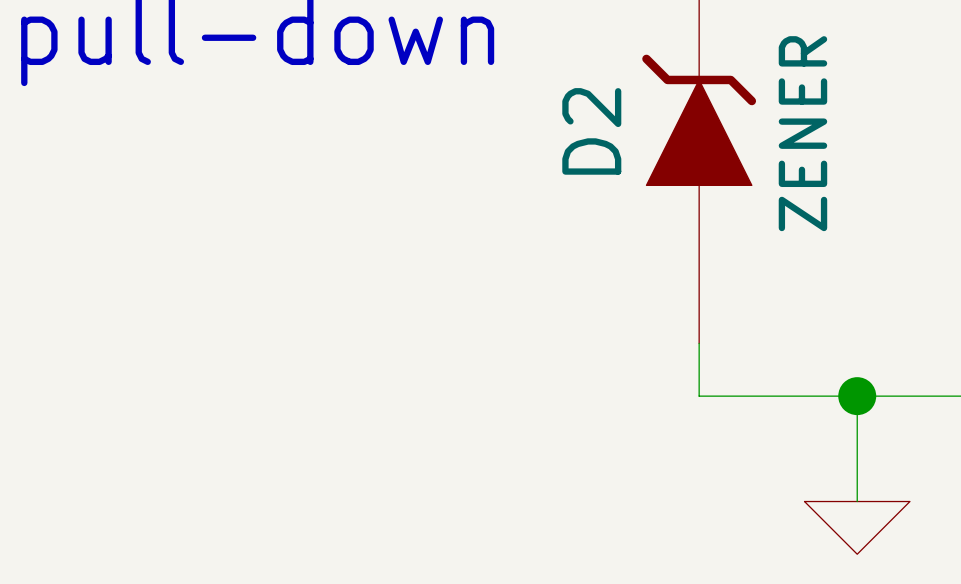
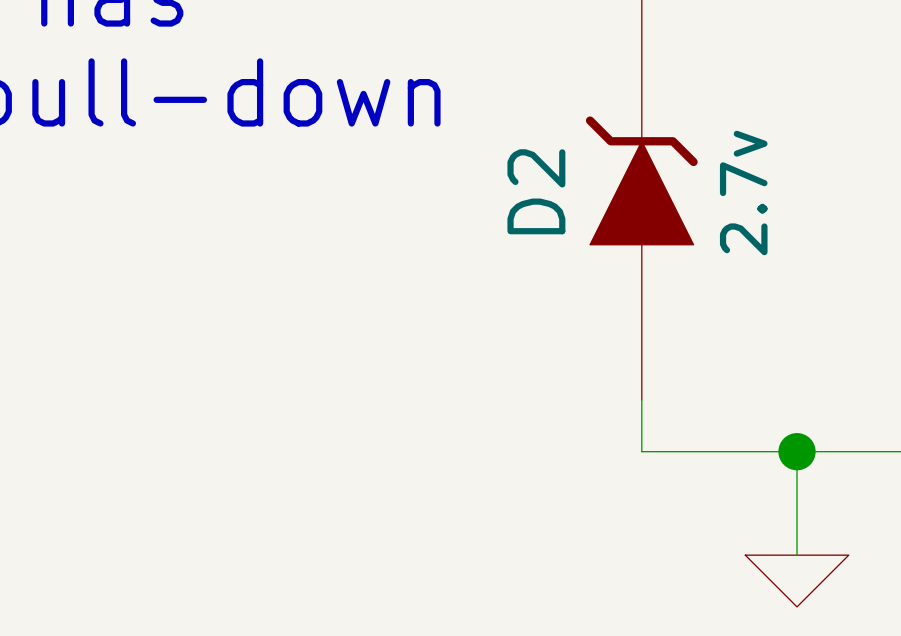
D2 value: ZENER (802, 133) -> 2.7v (743, 193)

